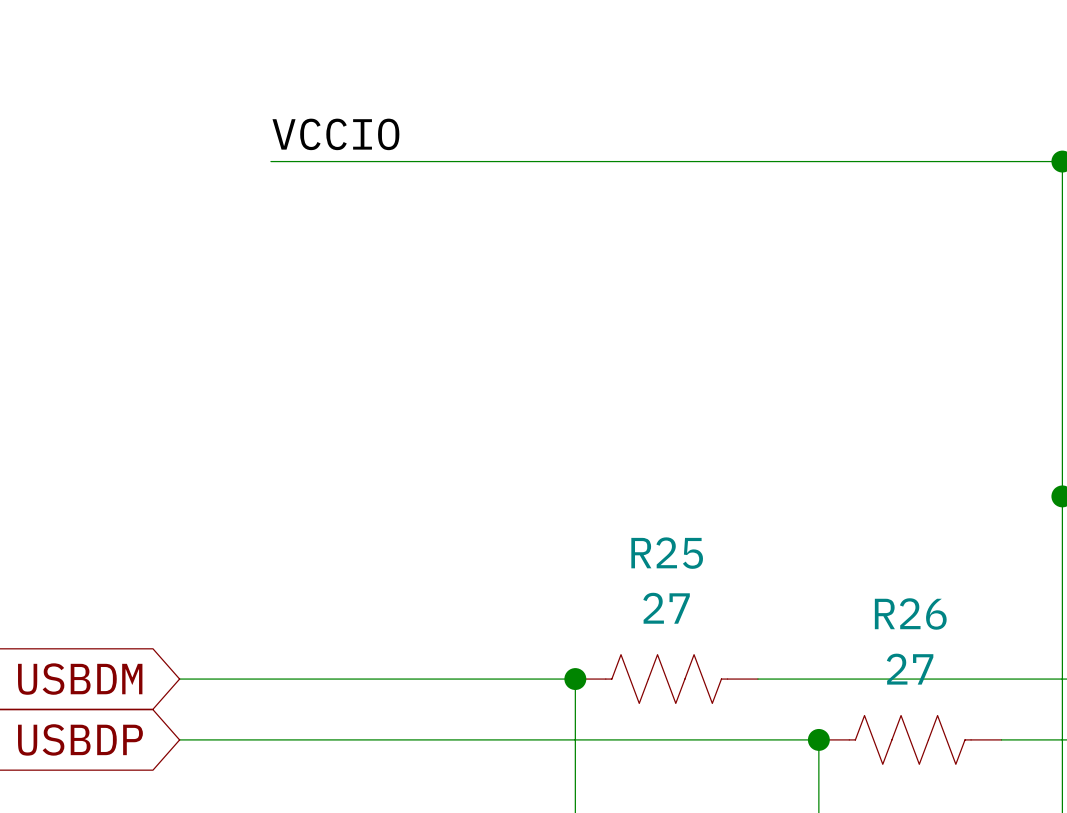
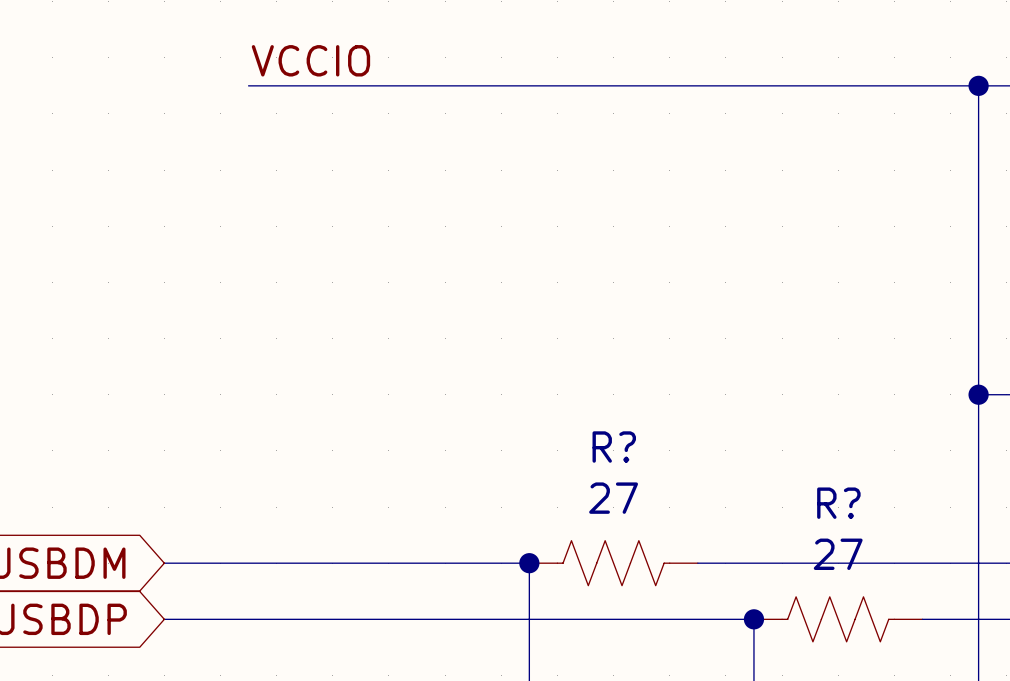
R25 name: R25 (667, 553) -> R? (614, 447)
R26 name: R26 (910, 613) -> R? (838, 503)

